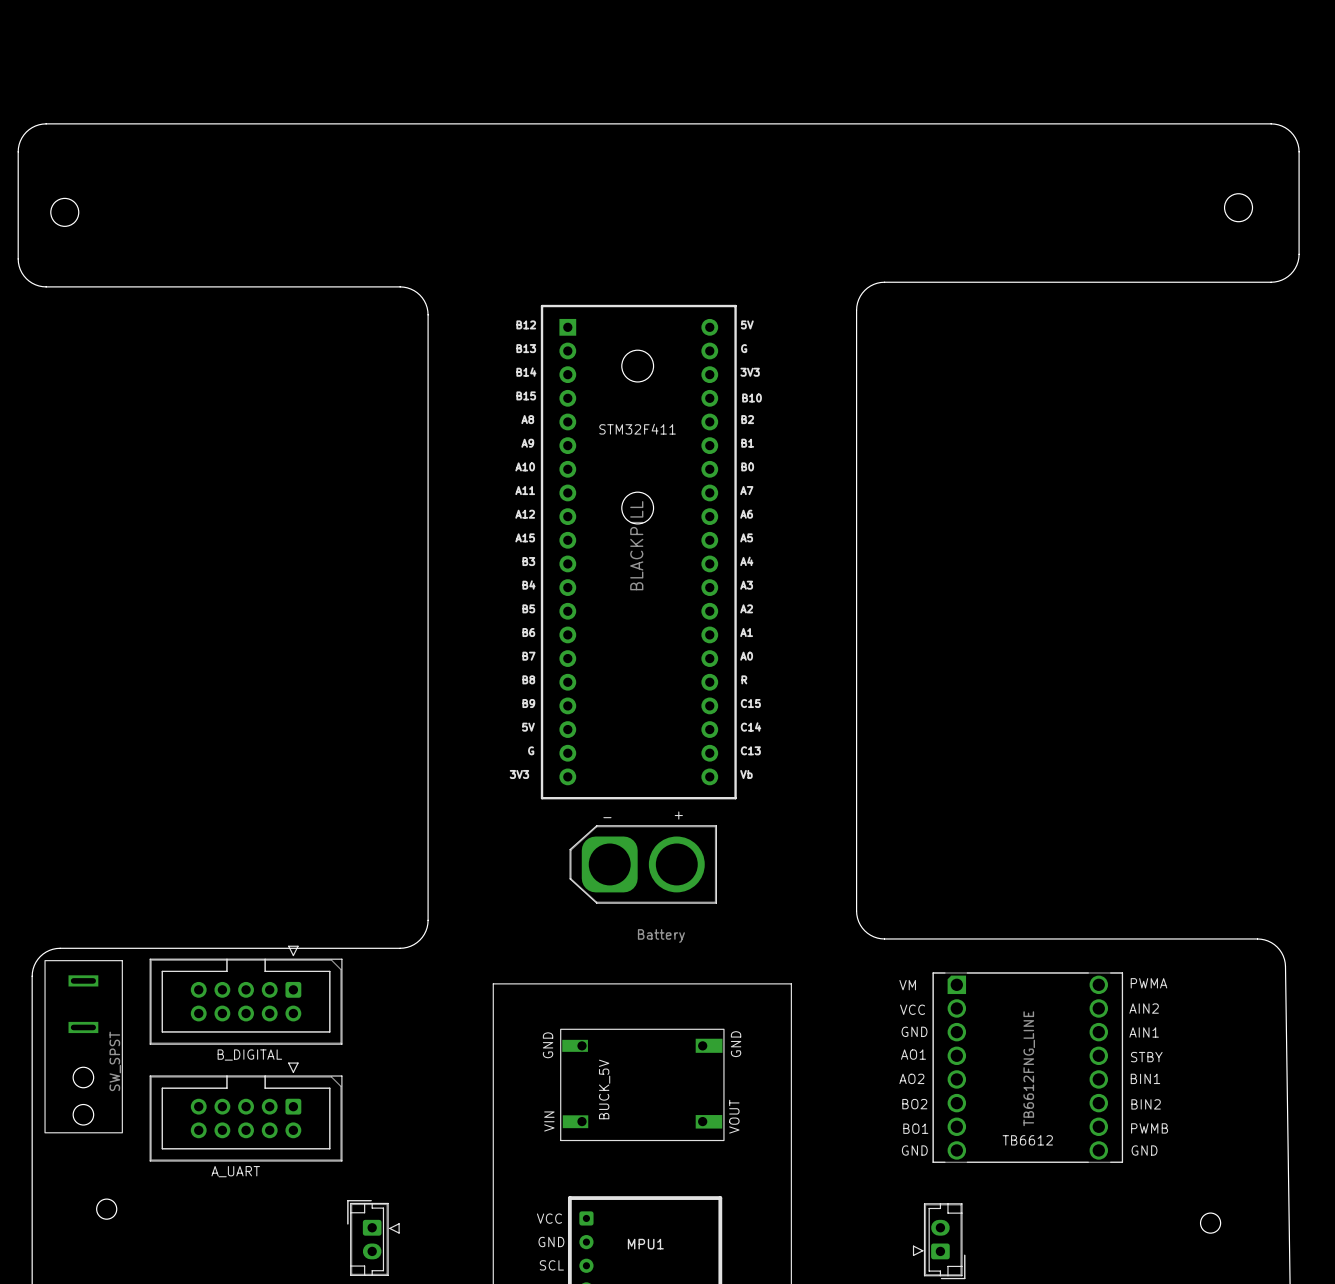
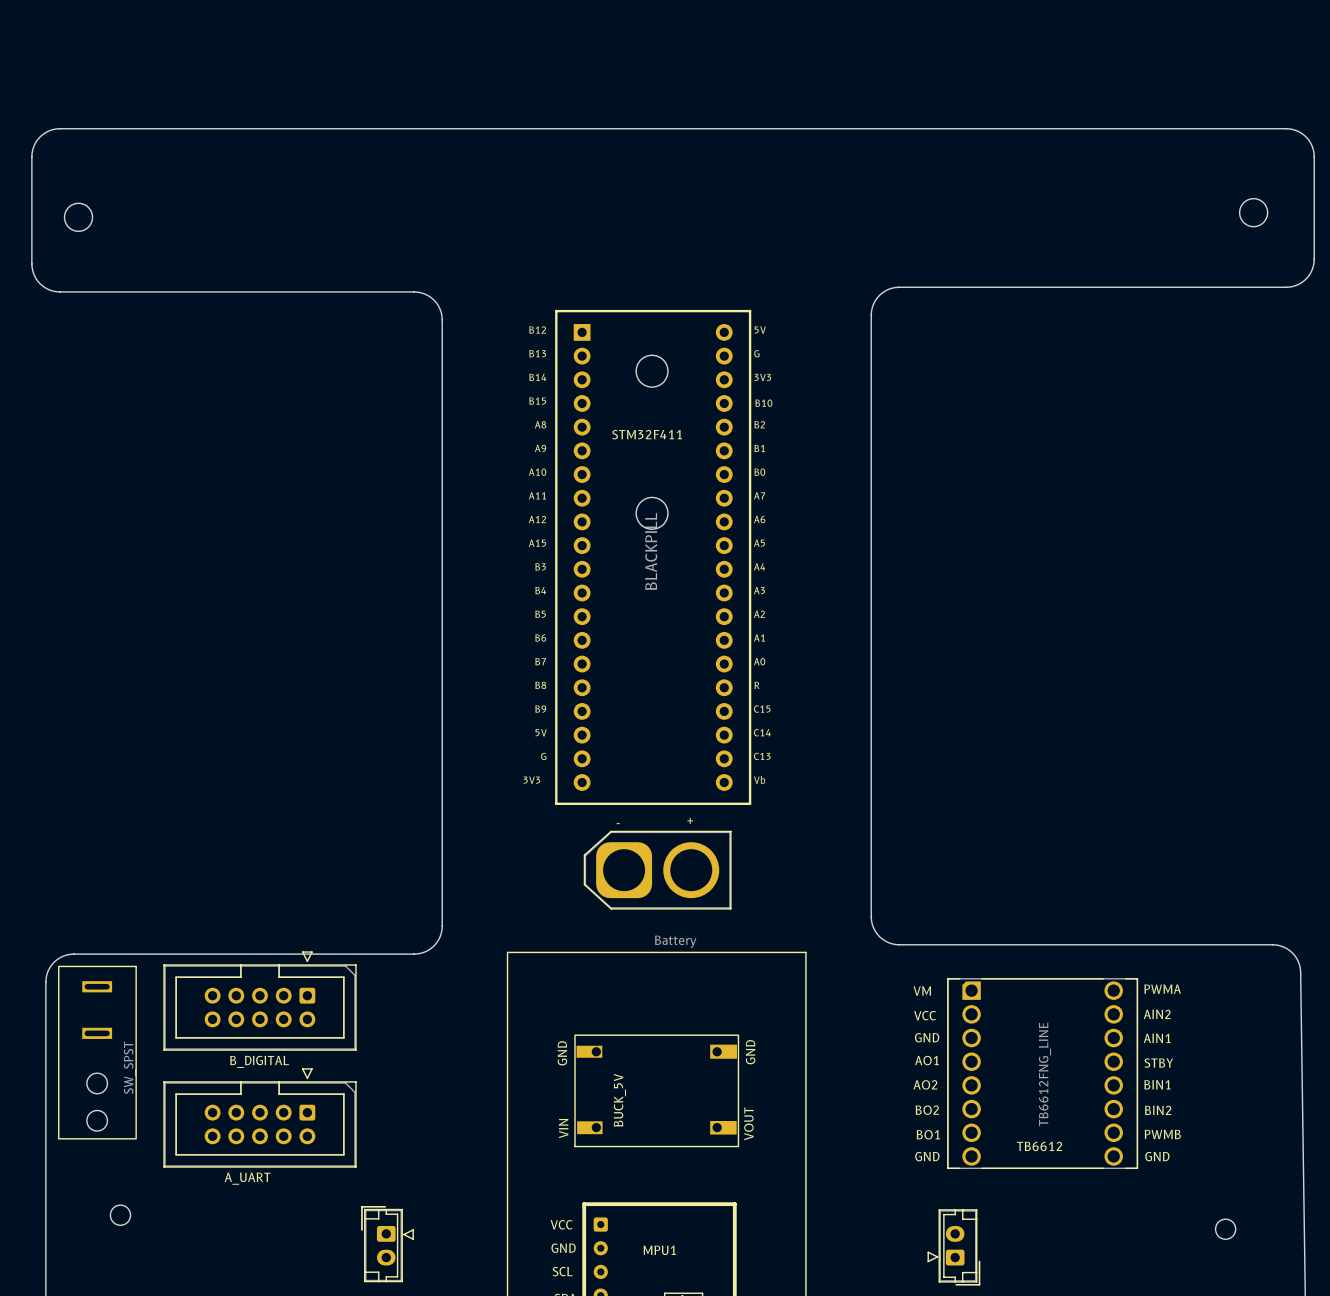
line: (493, 983) (791, 983) -> (507, 989) (507, 952) (805, 952) (805, 989)

